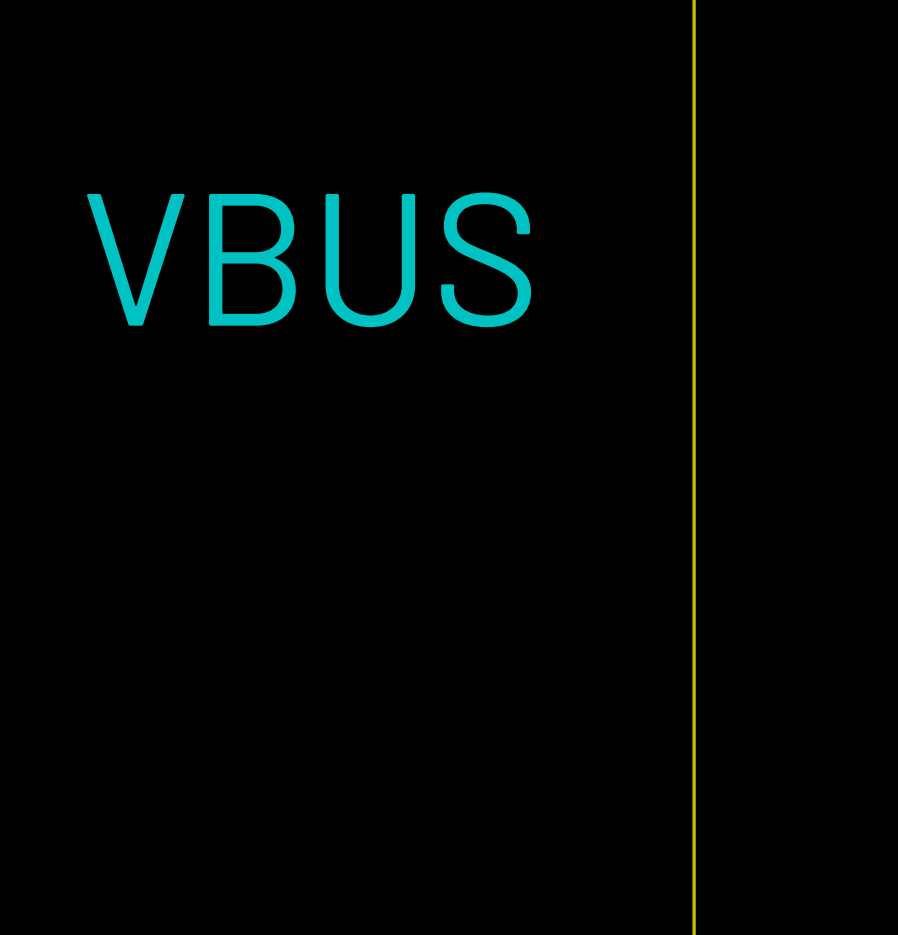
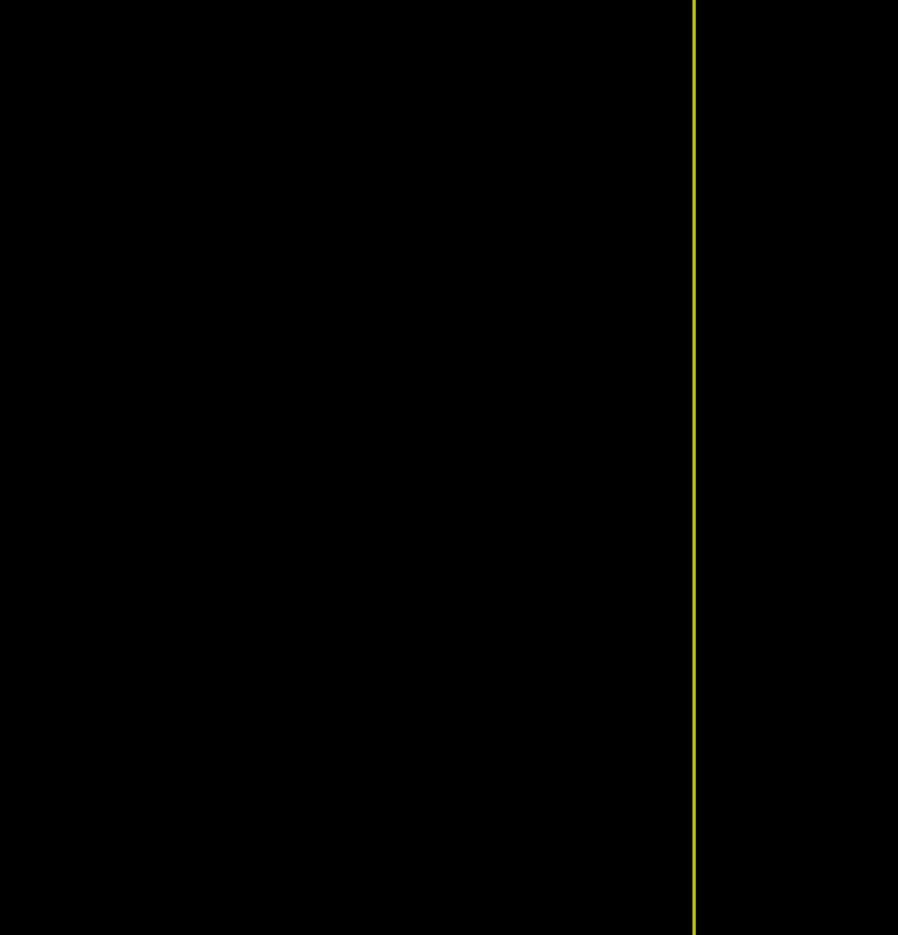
text: VBUS (309, 259) -> none

